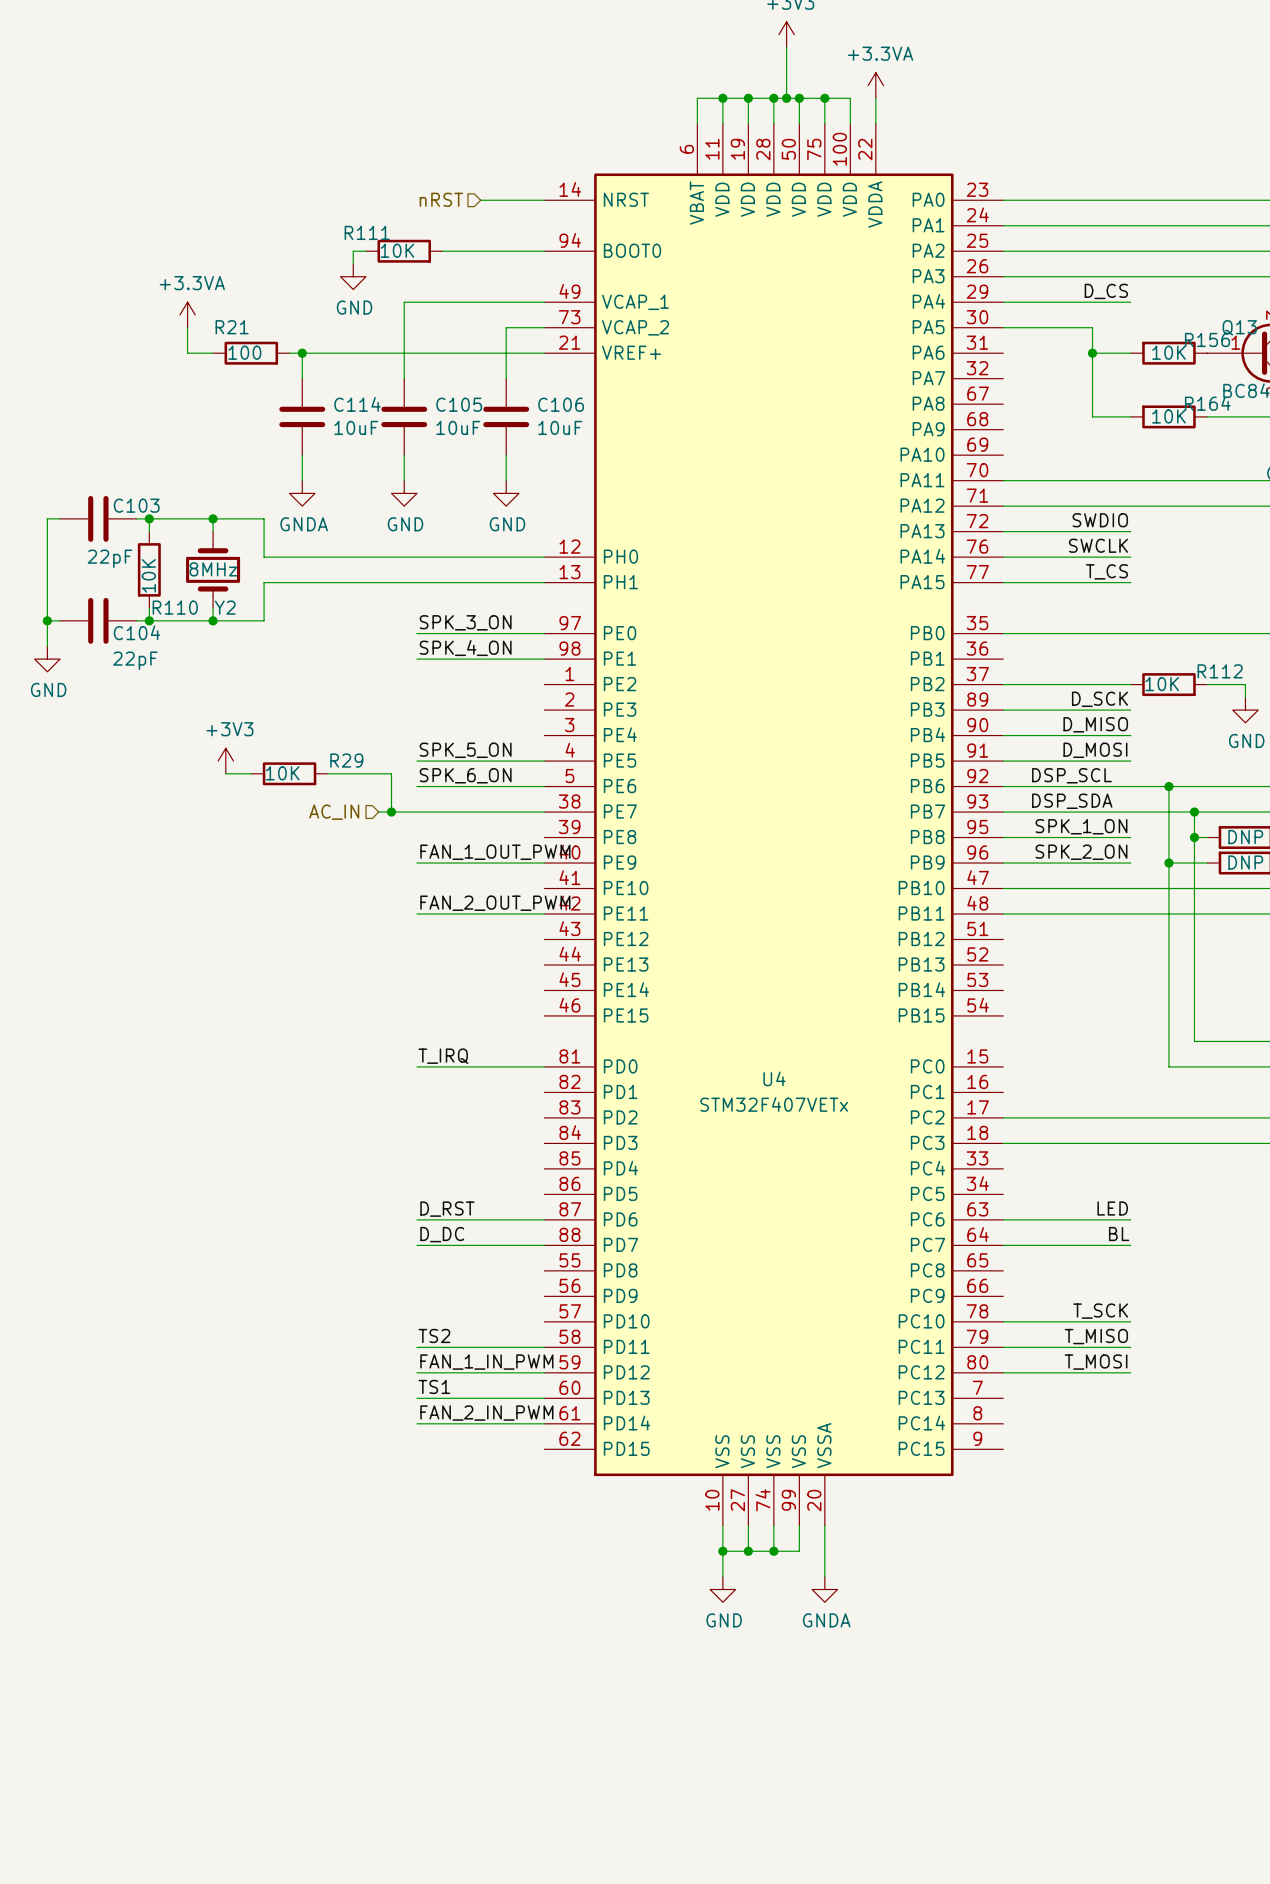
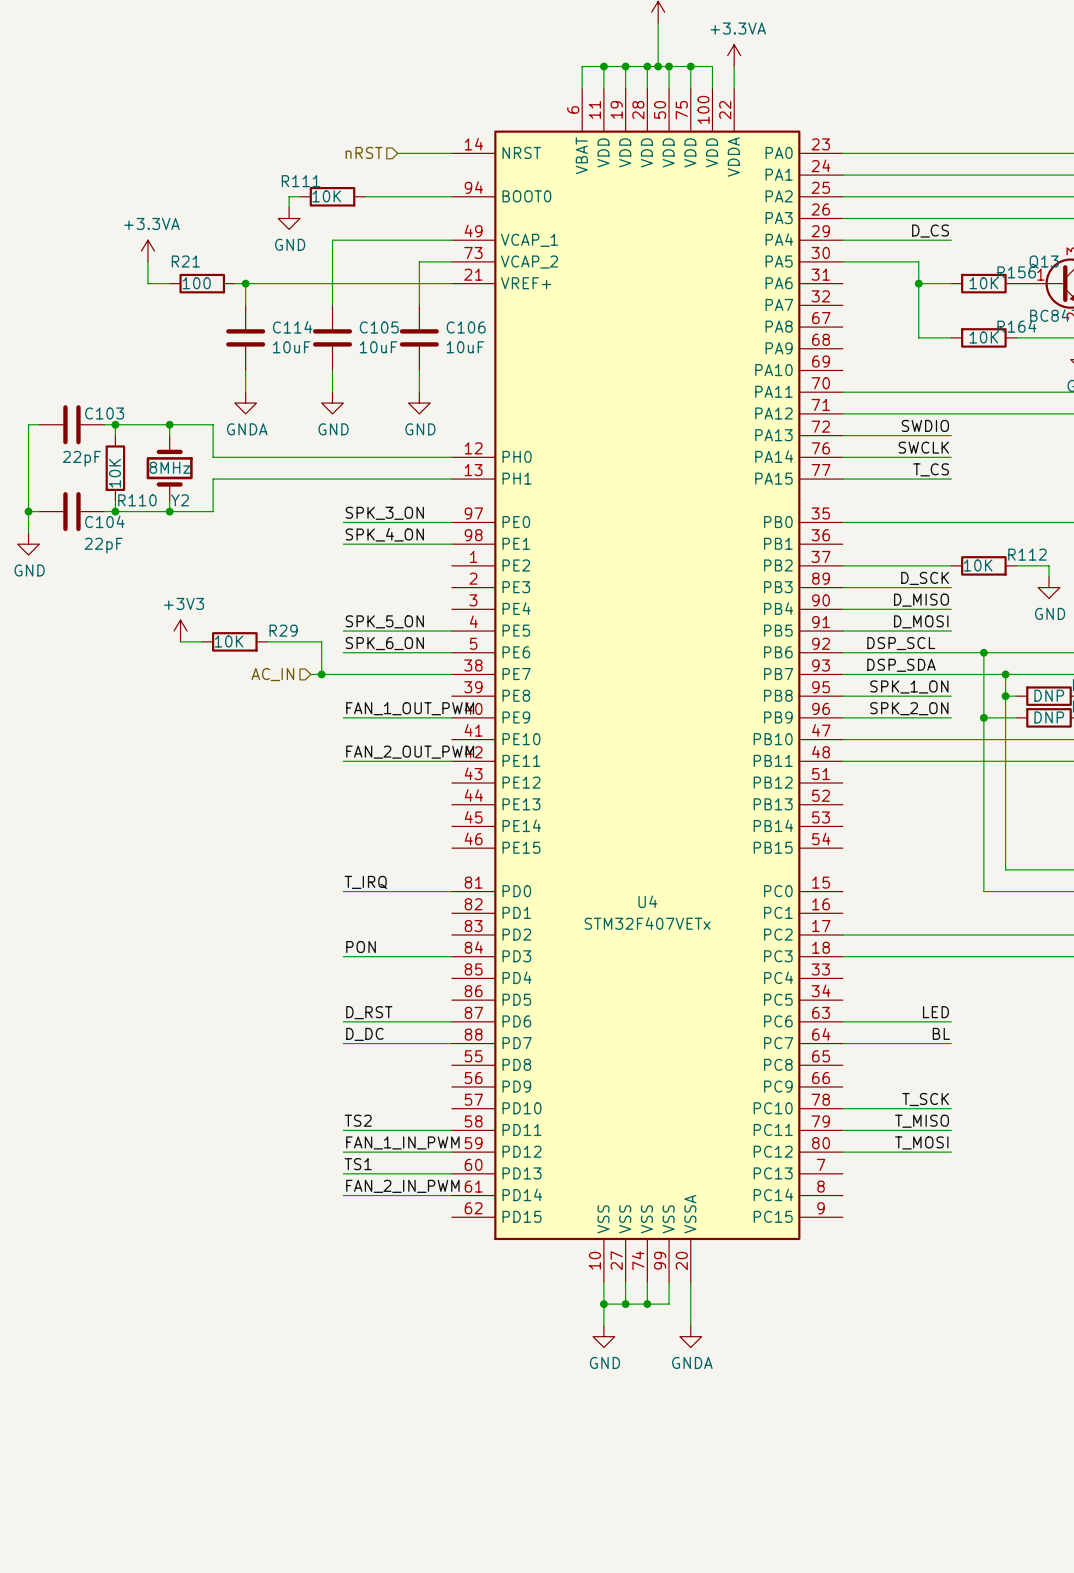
label: none -> PON (361, 947)
wire: none -> (343, 956) (451, 956)

